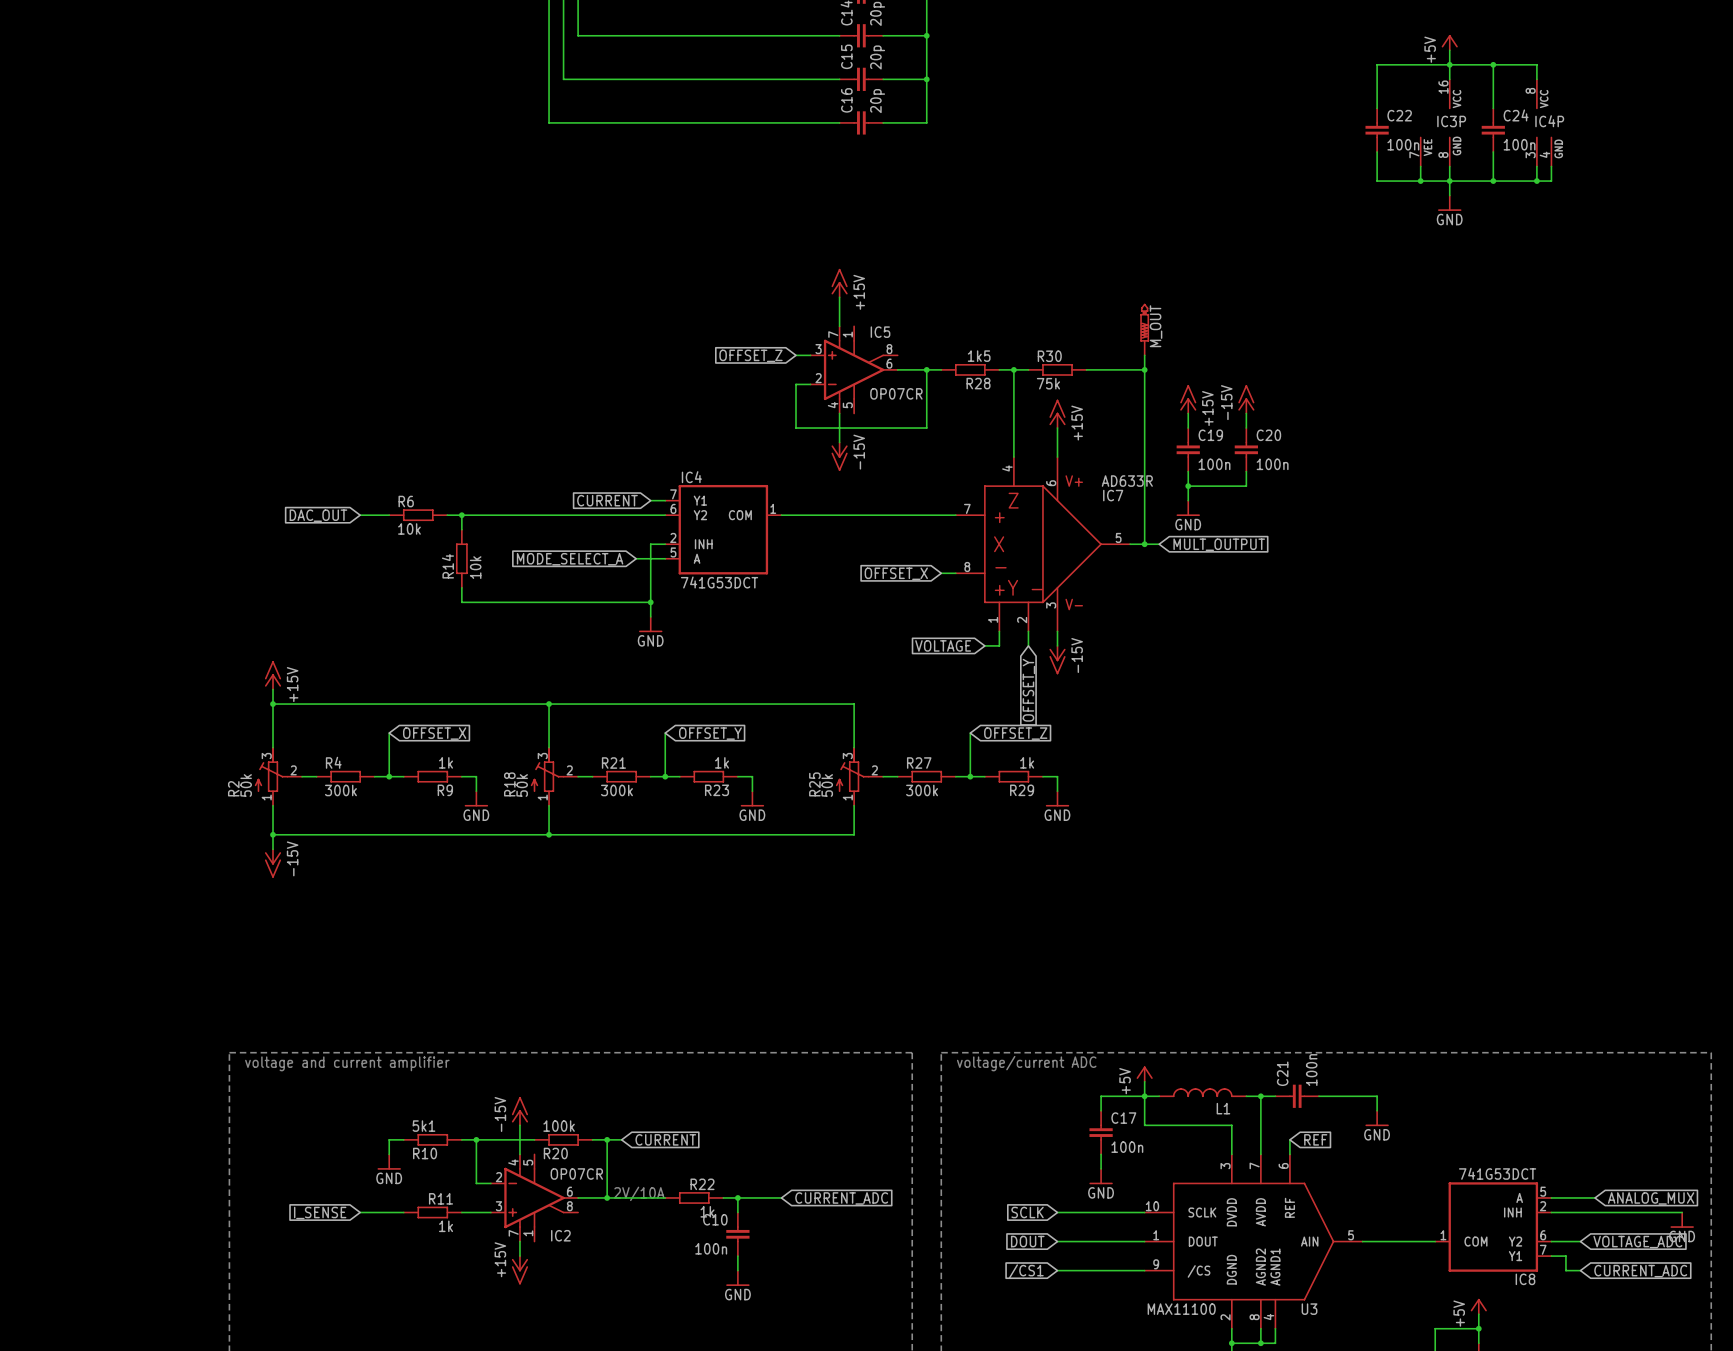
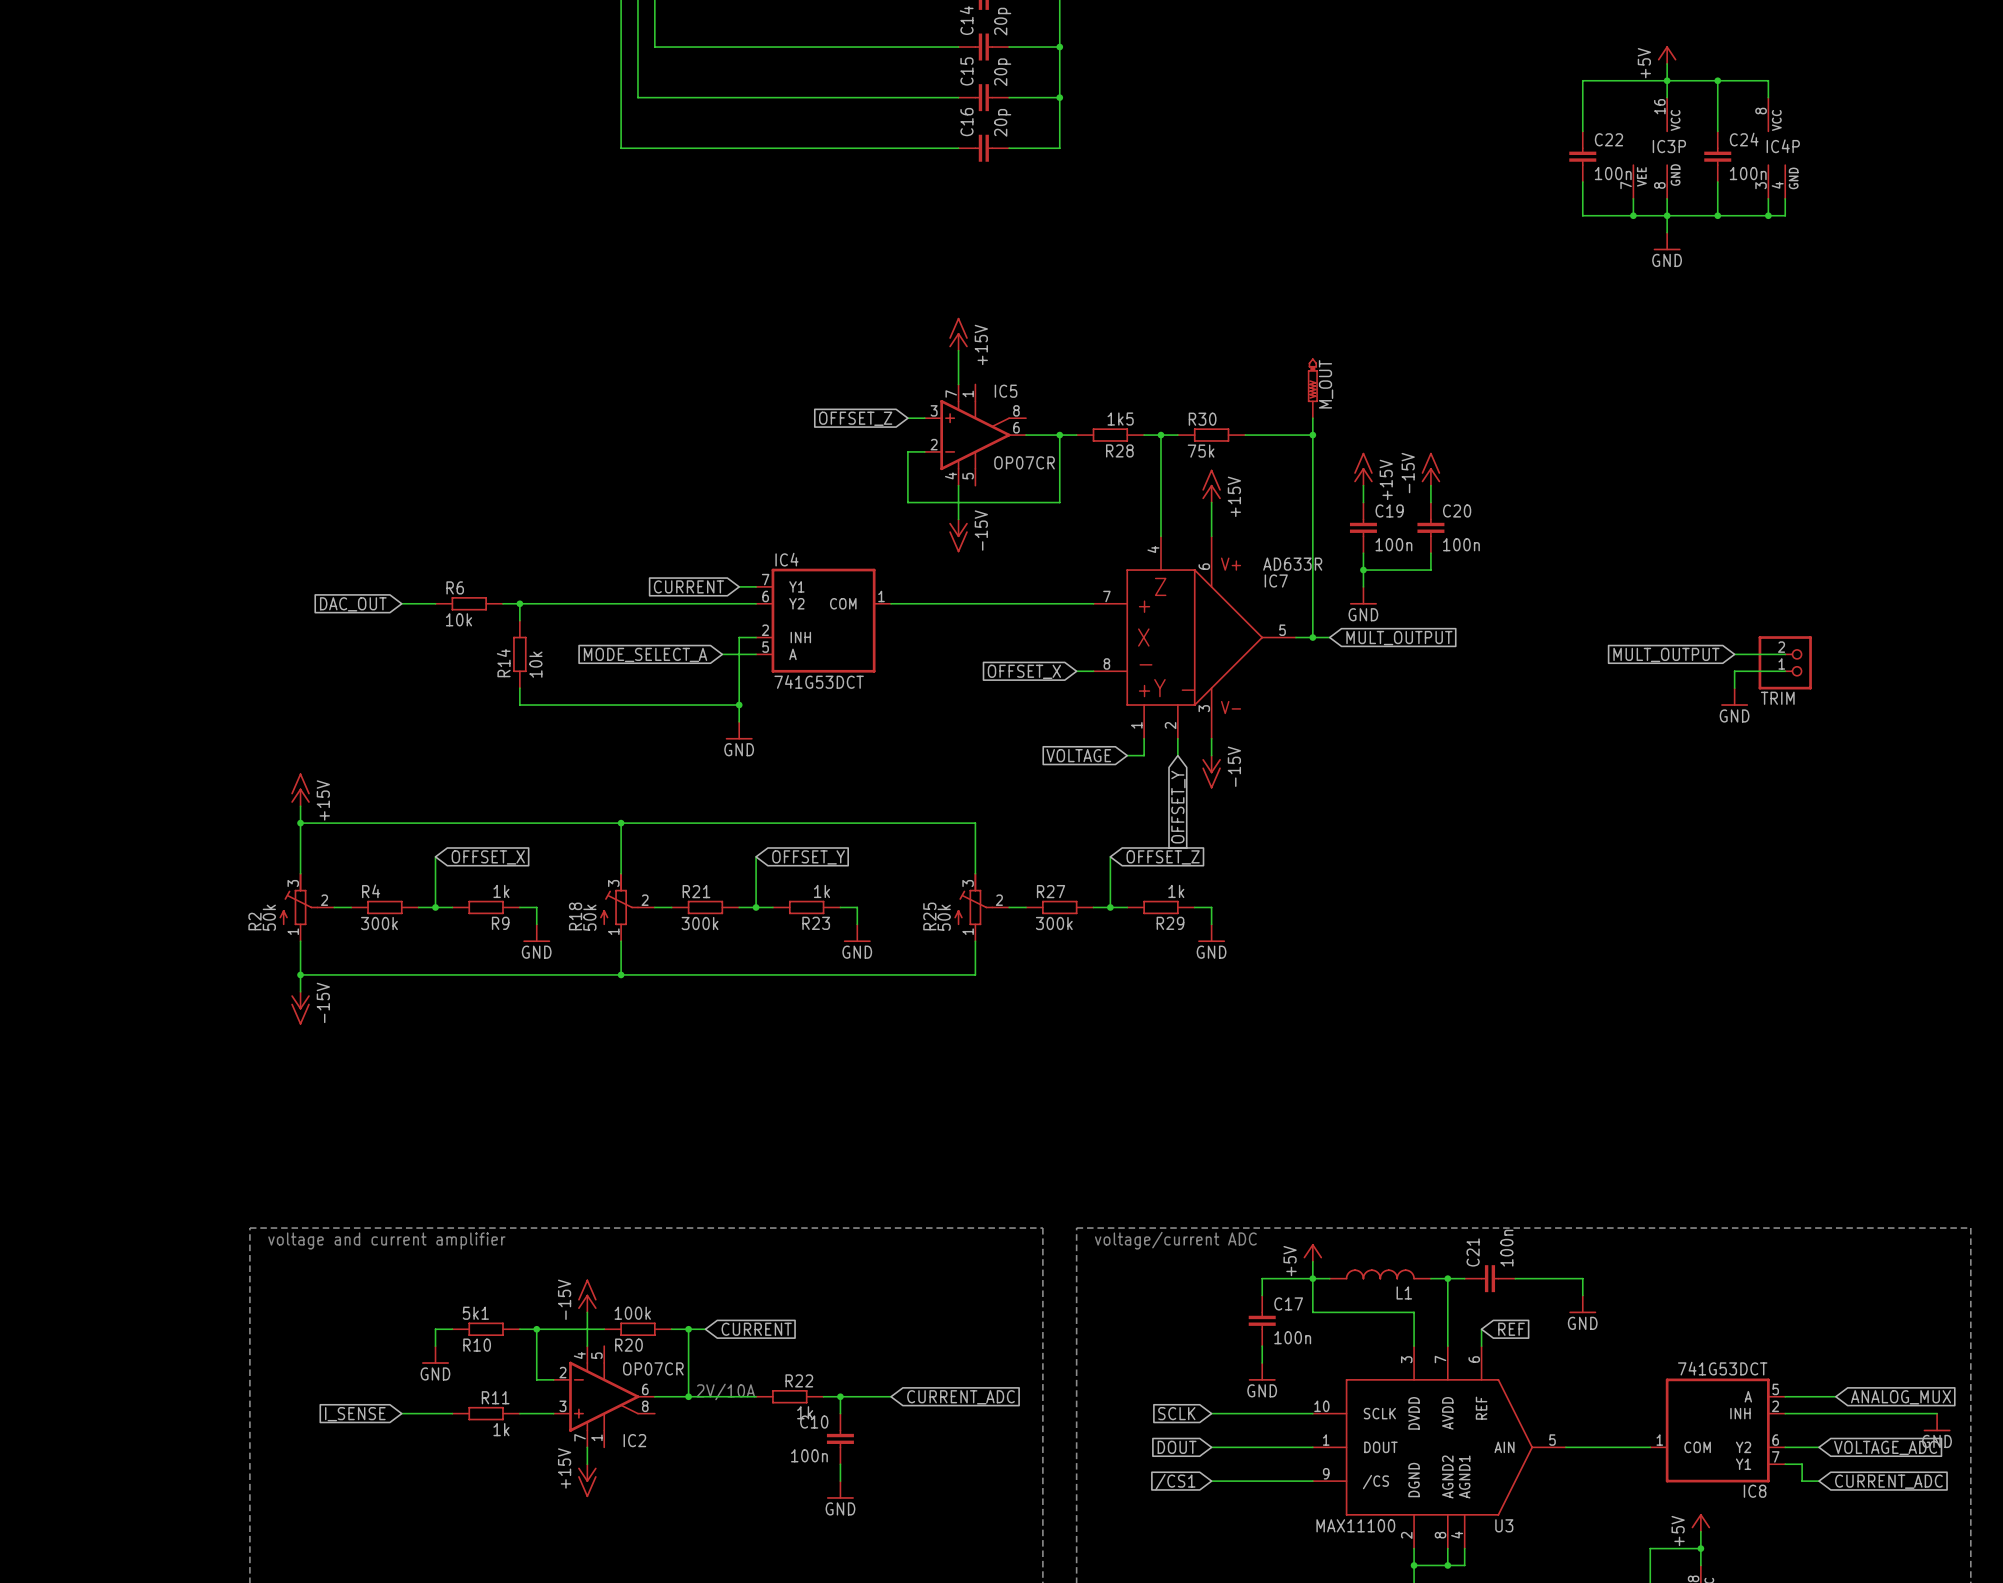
wire: none -> (1734, 654) (1785, 654)
global label: none -> MULT_OUTPUT (1666, 654)
TRIM: none -> (1785, 662)
wire: none -> (1785, 671) (1734, 671) (1734, 688)
power symbol: none -> GND (1734, 697)

